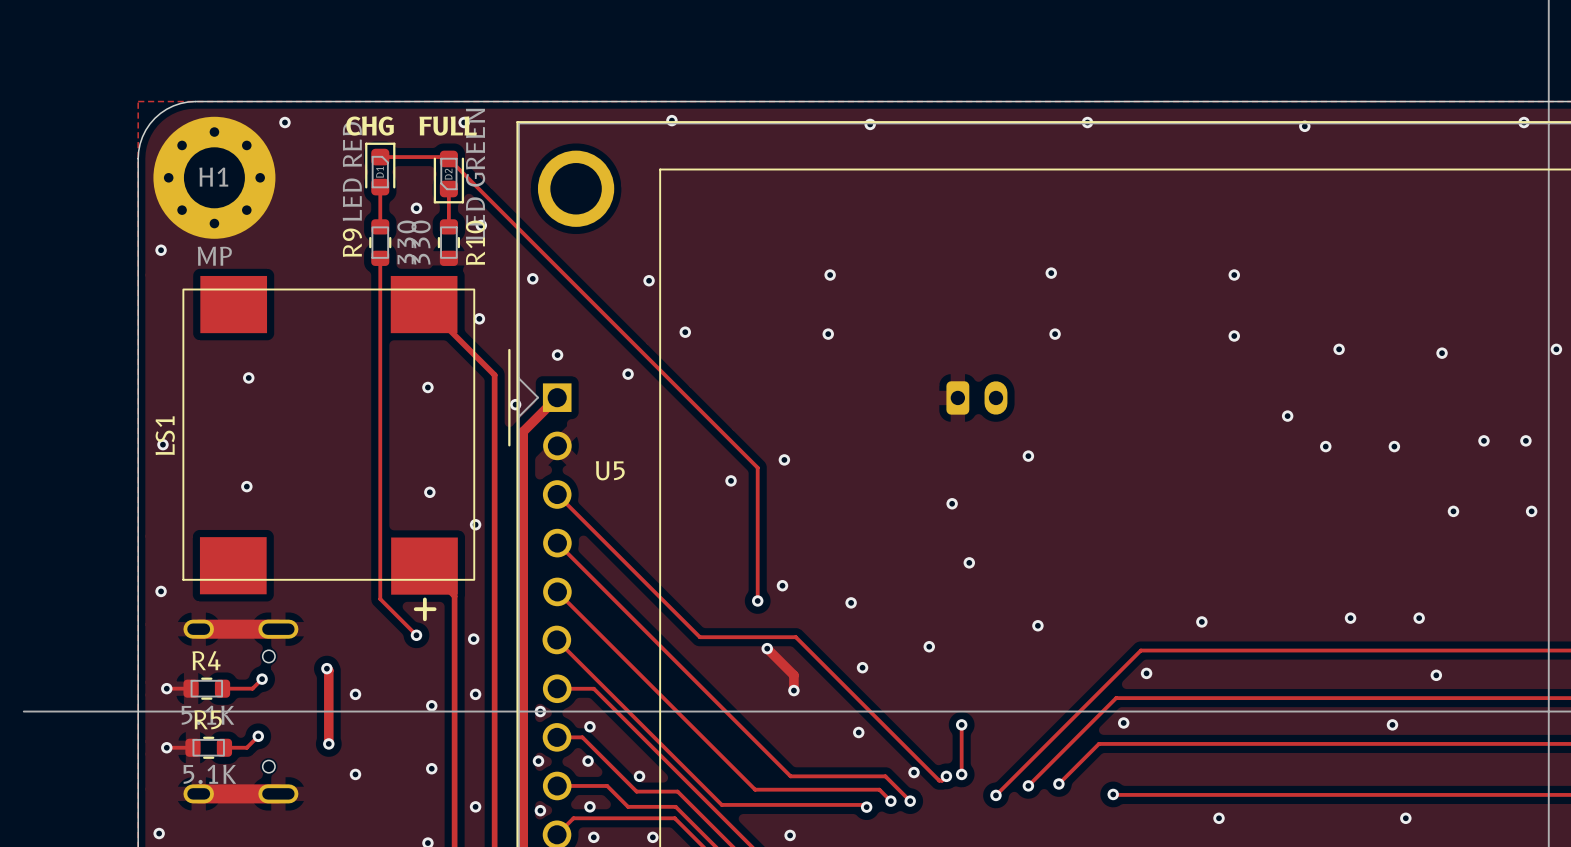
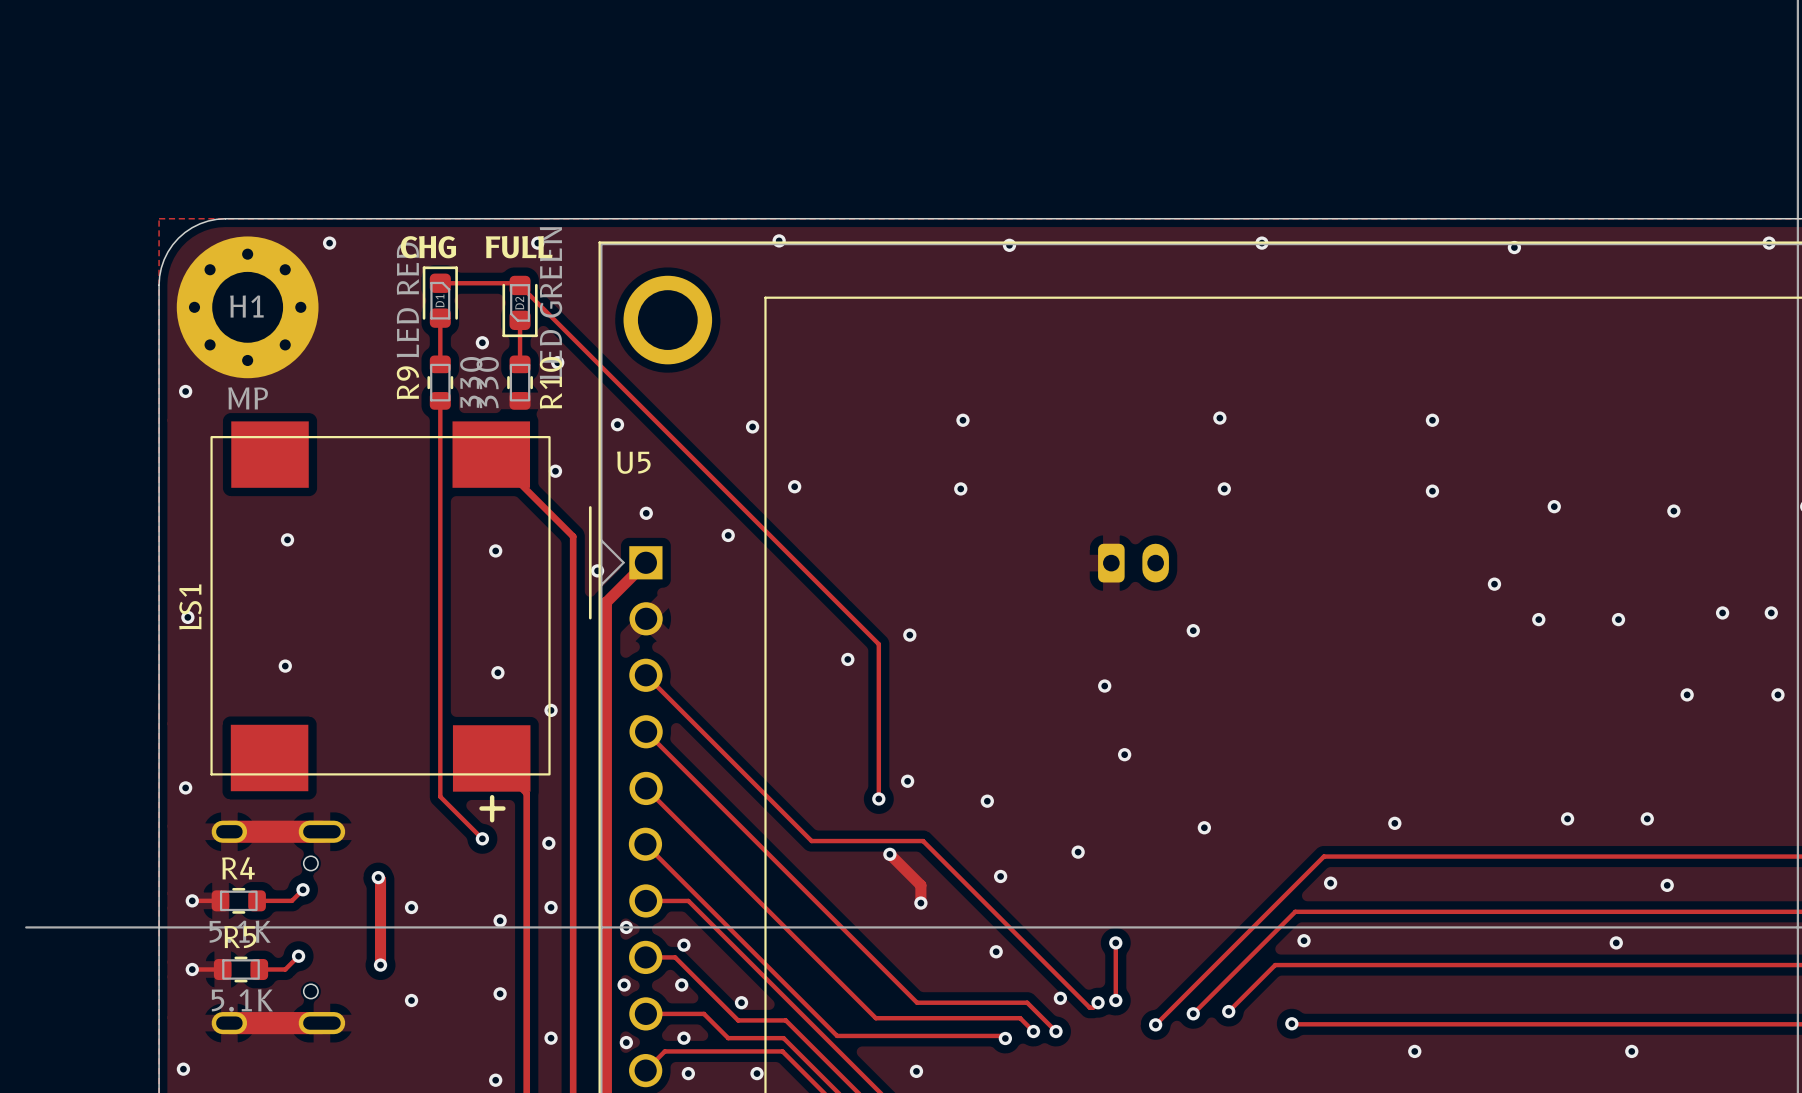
U5 name position: U5 (610, 470) -> U5 (633, 462)

